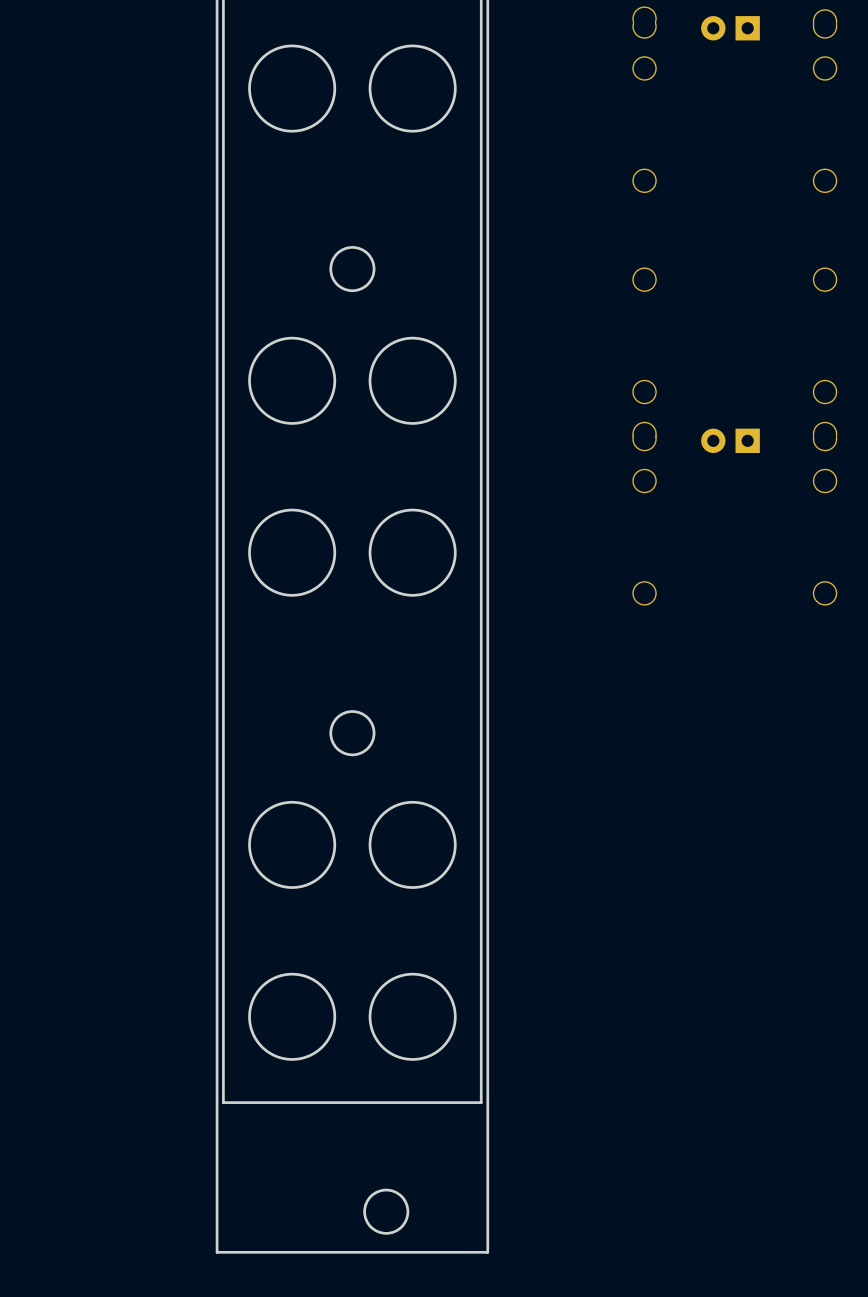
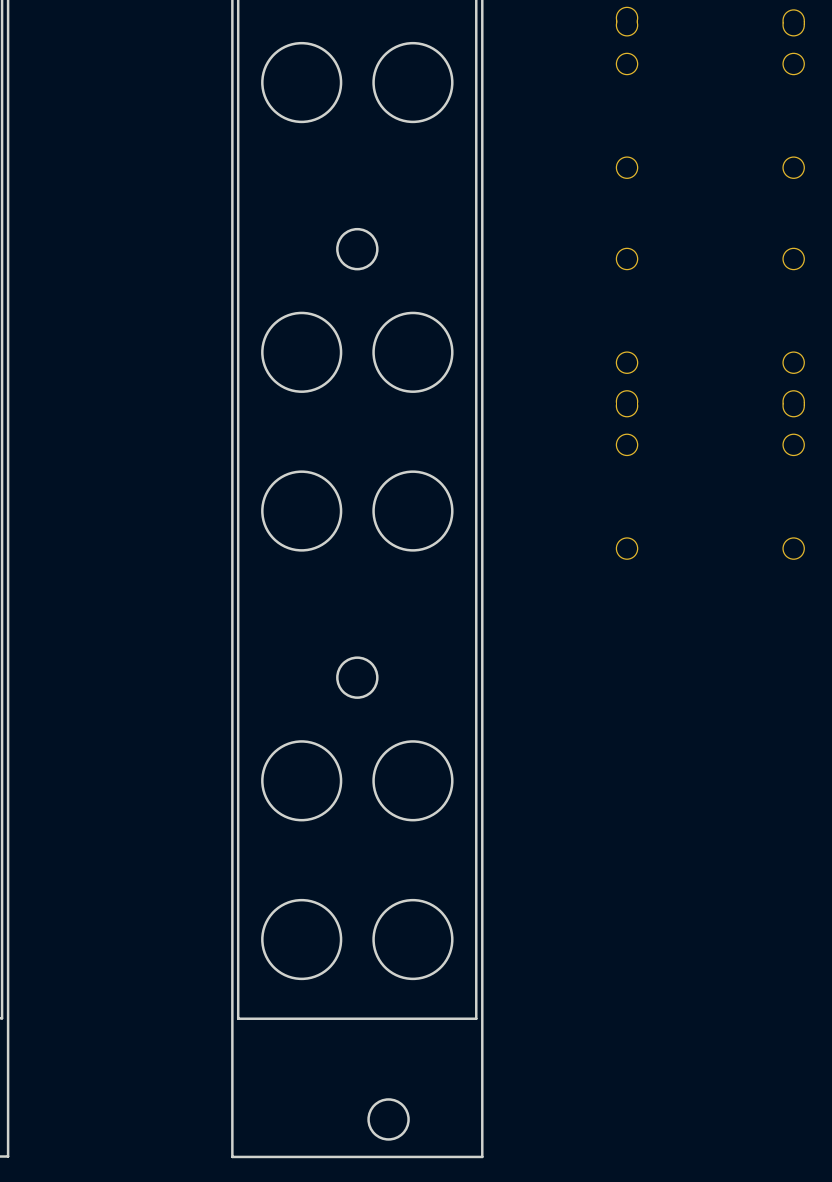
part: (730, 28) -> none
part: (730, 440) -> none

